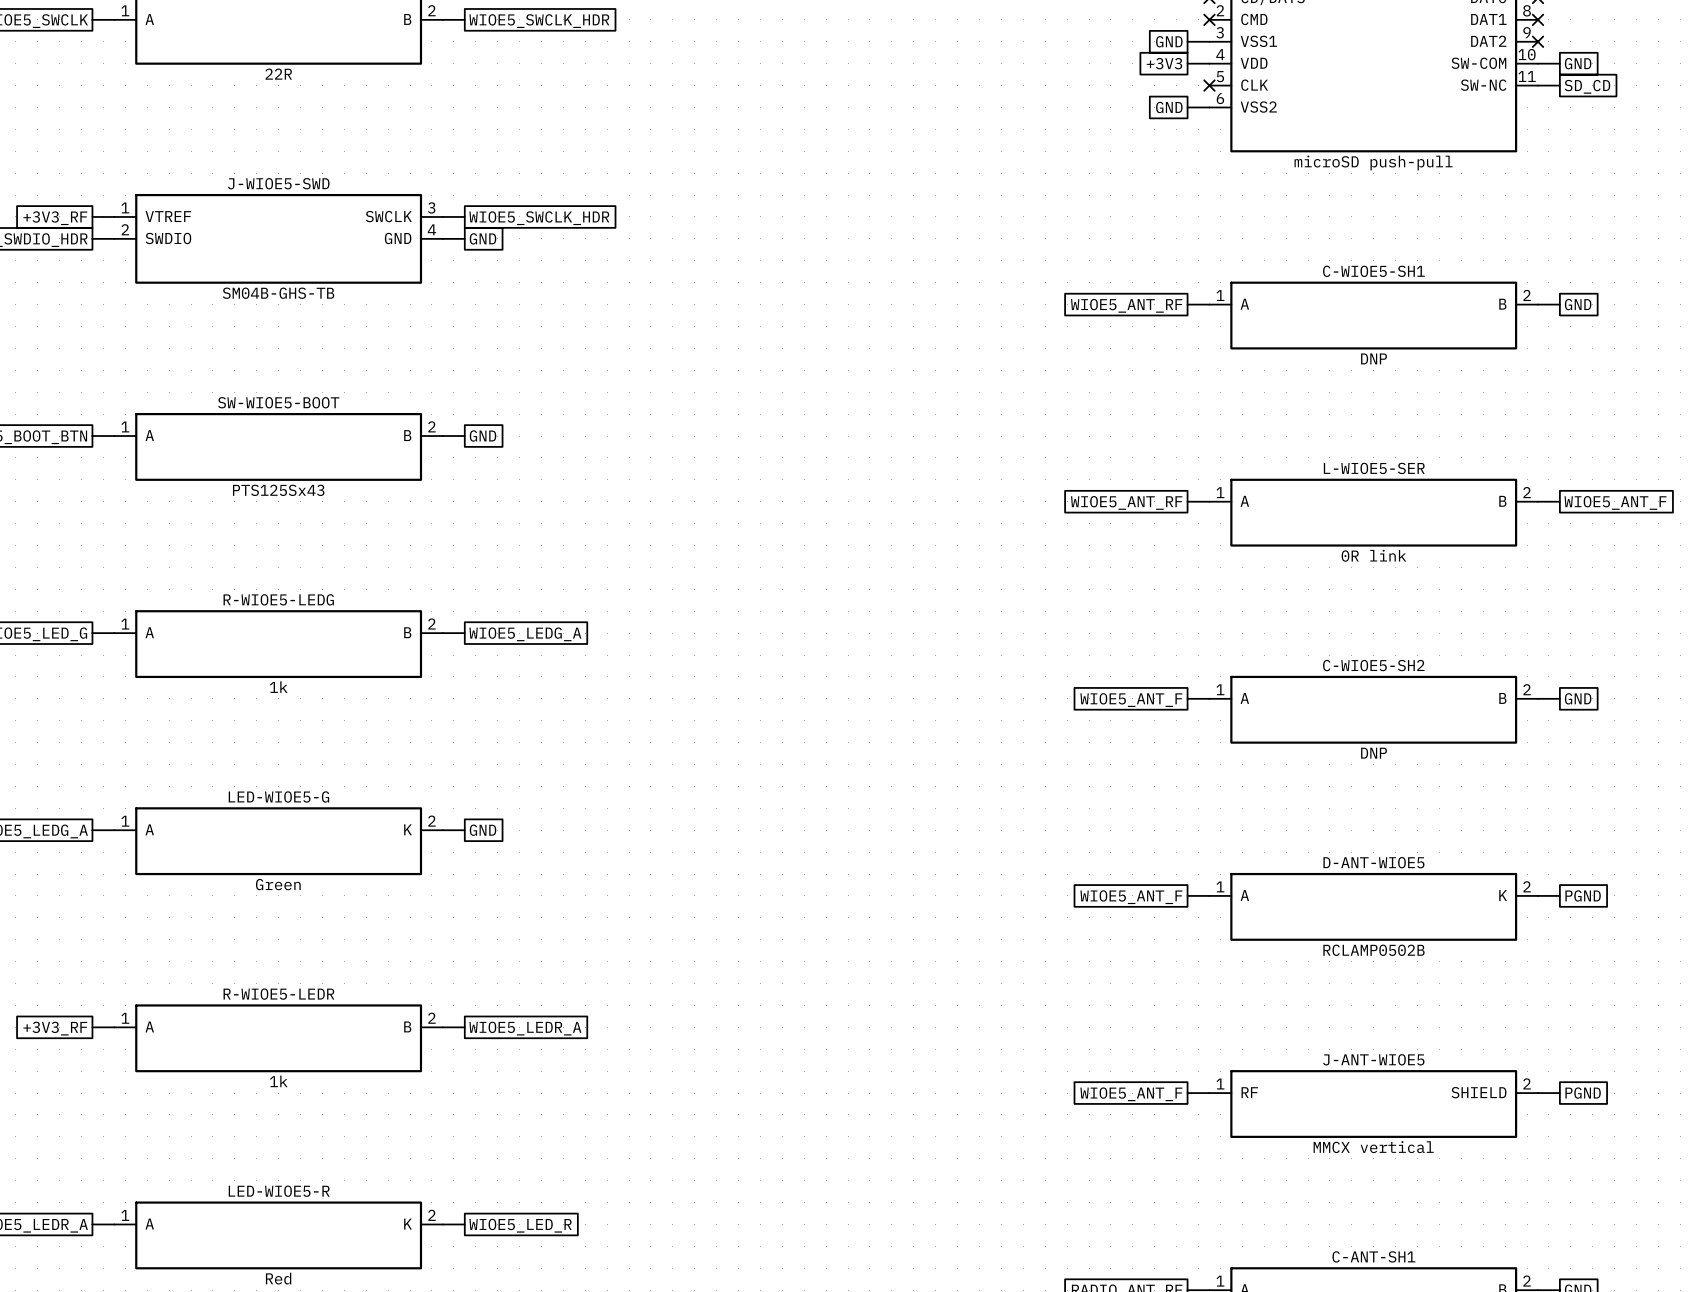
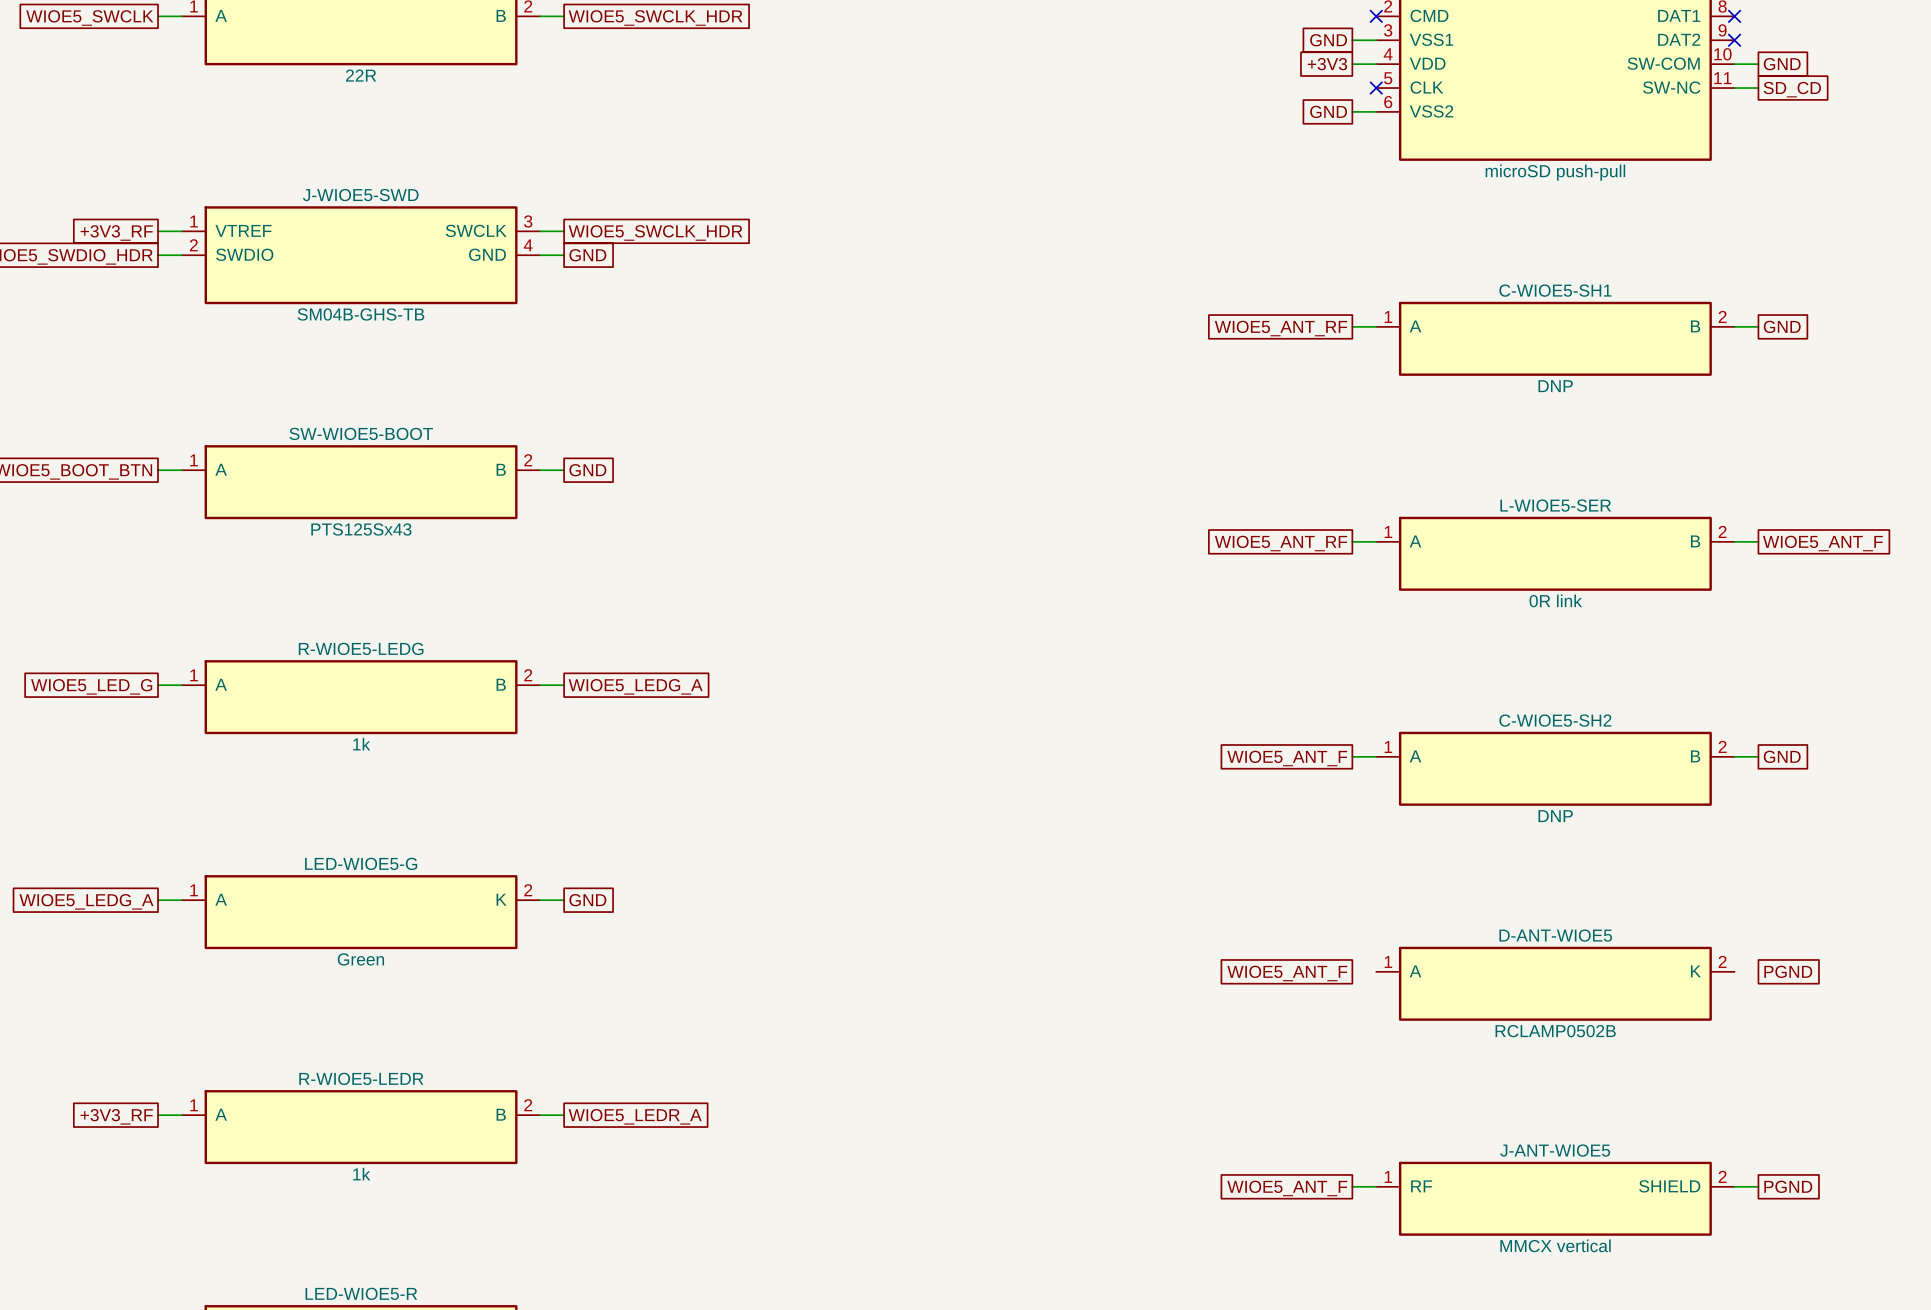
wire: (1187, 895) (1209, 895) -> none
wire: (1537, 895) (1559, 895) -> none

